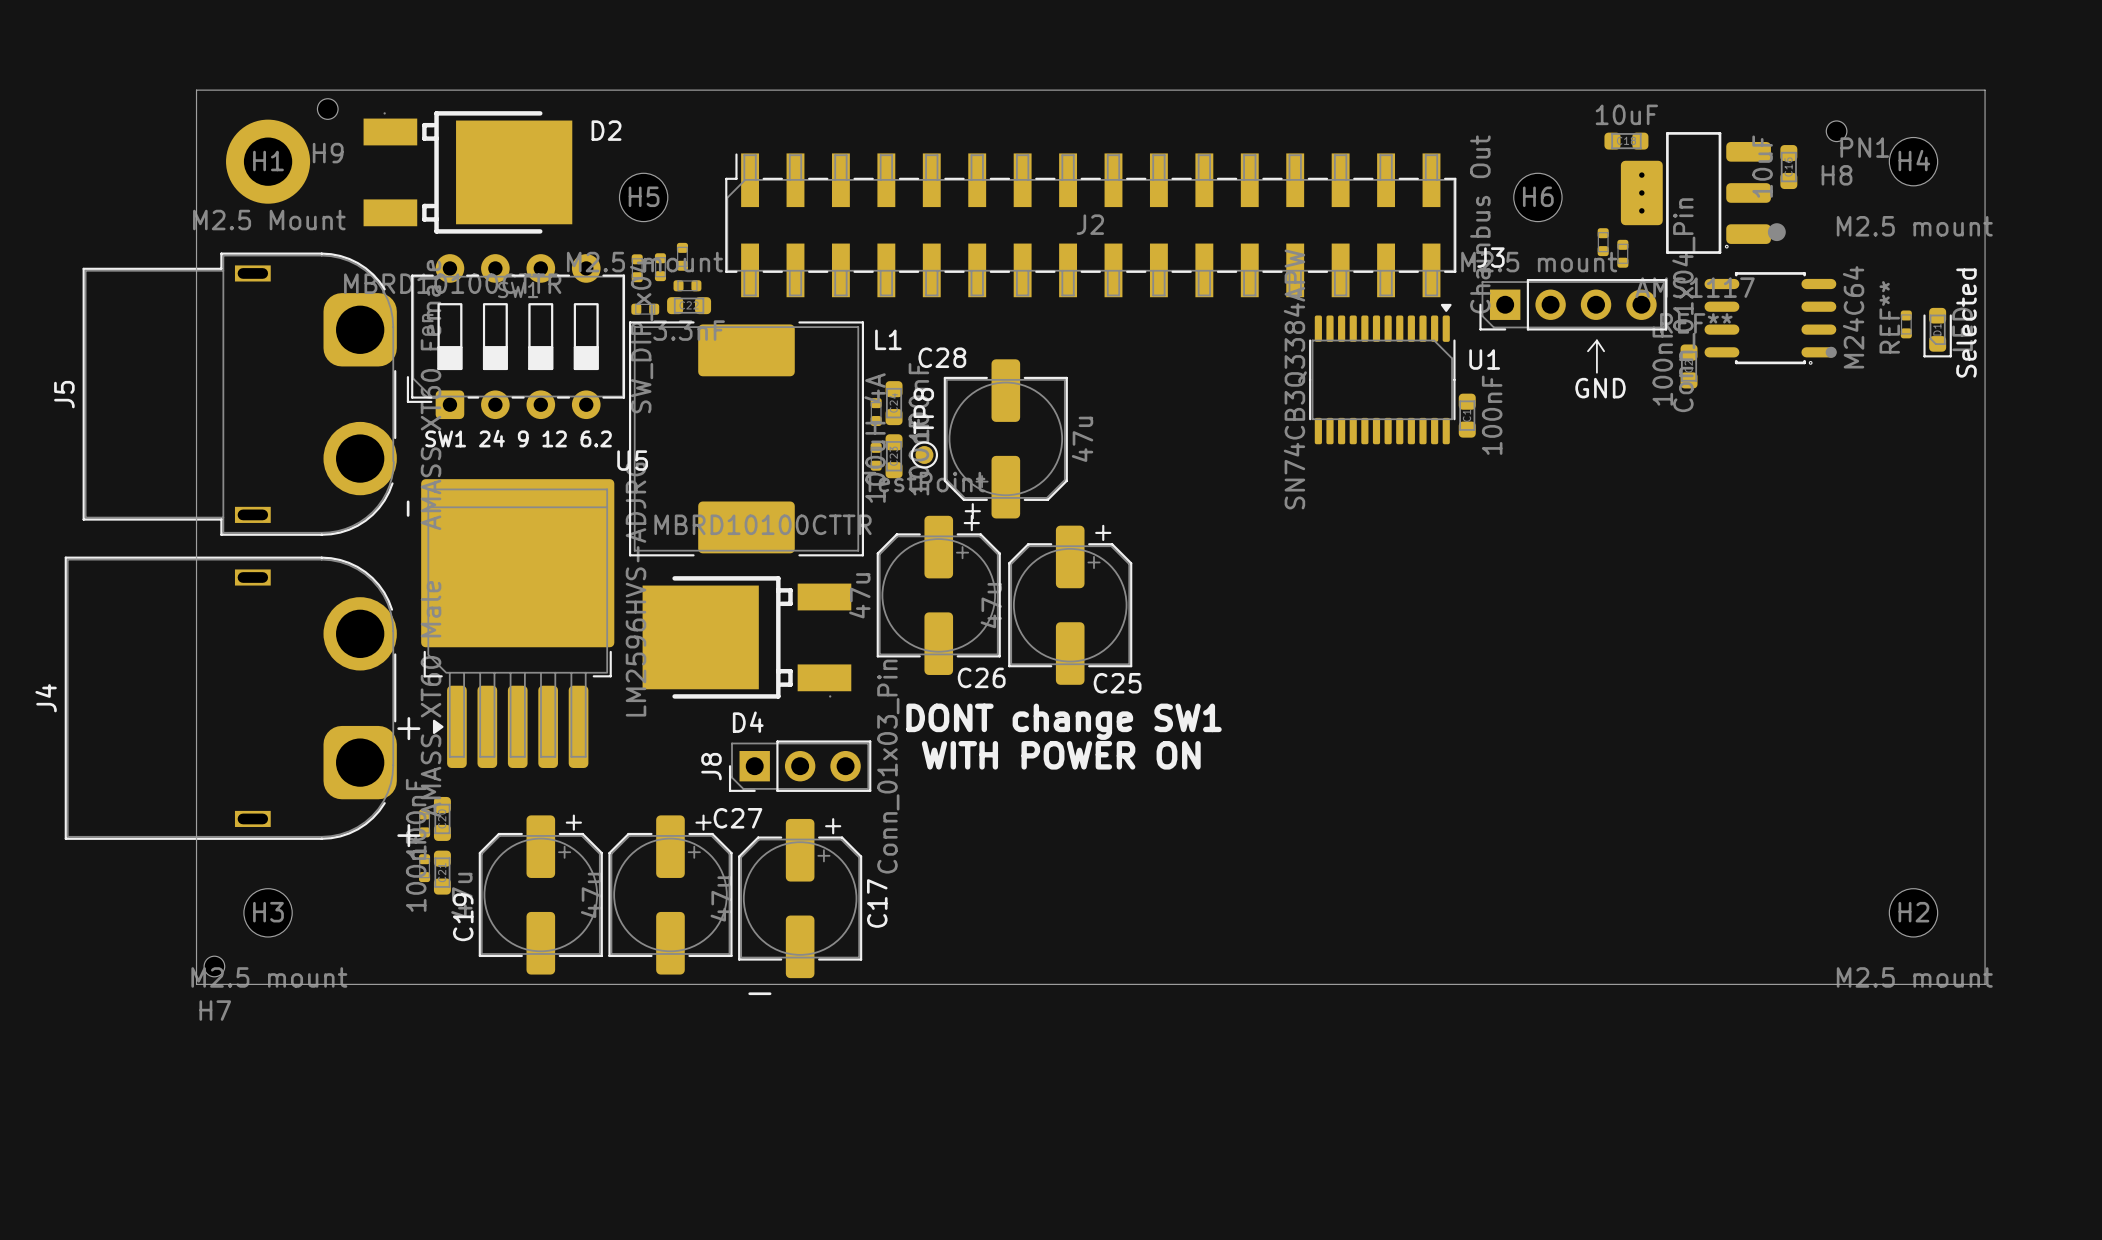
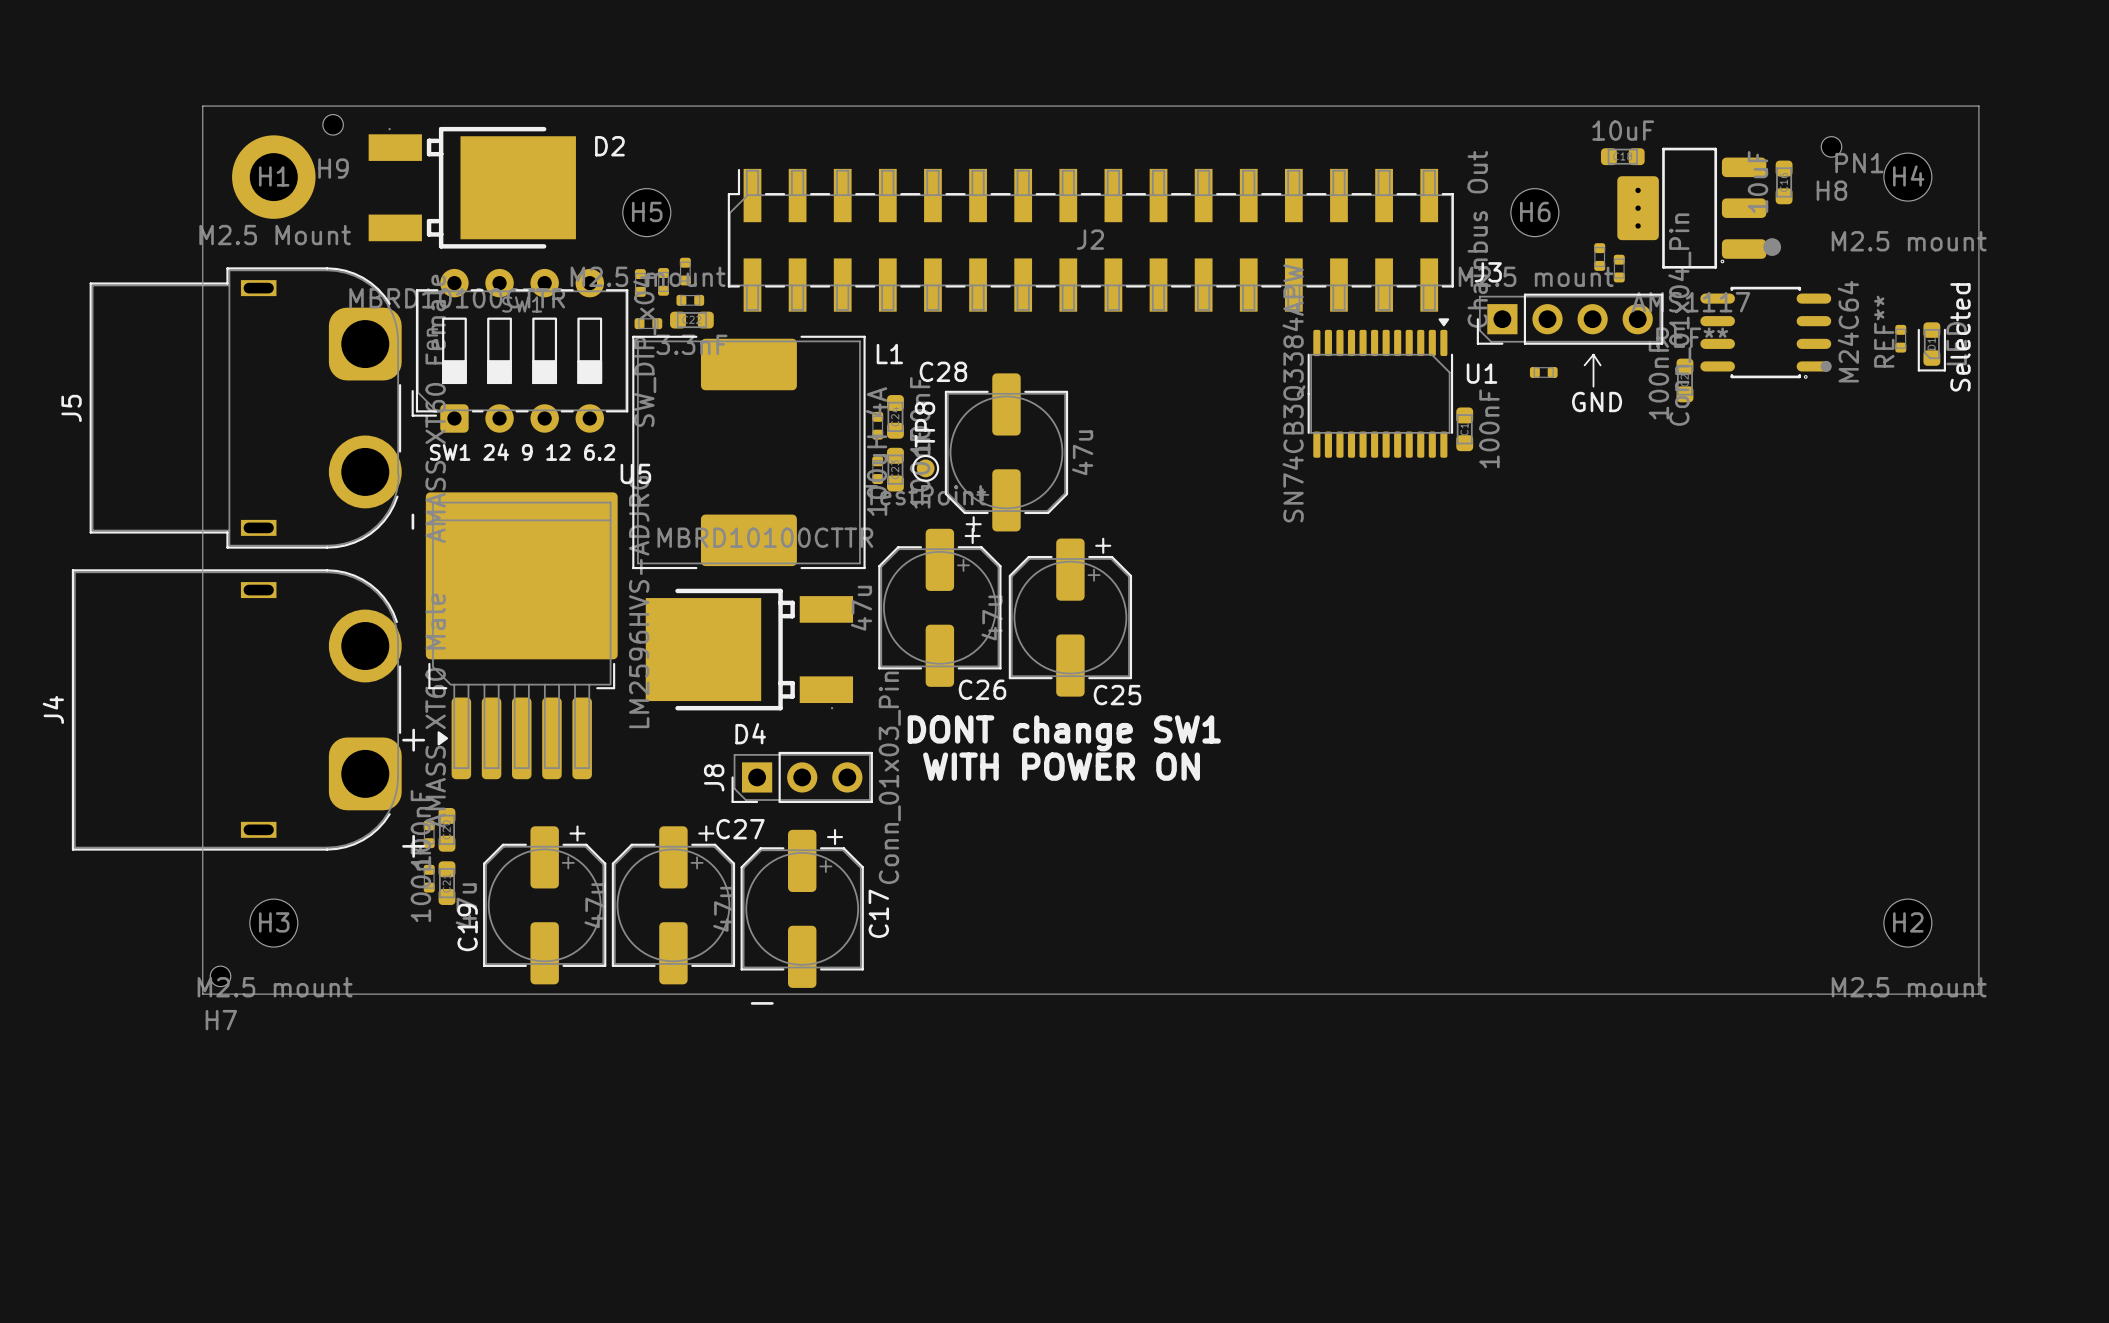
part: none -> (1543, 372)

